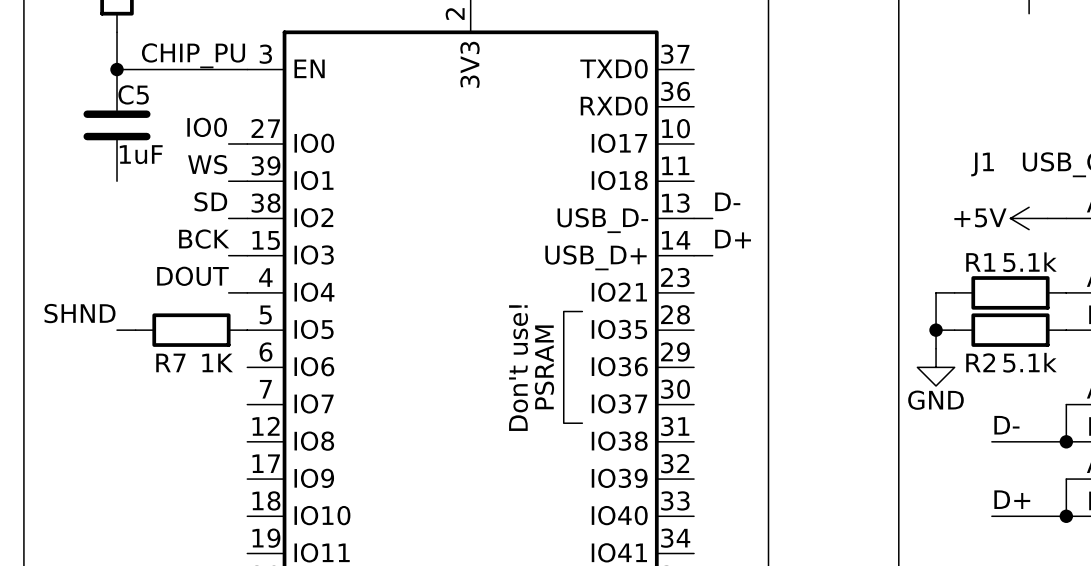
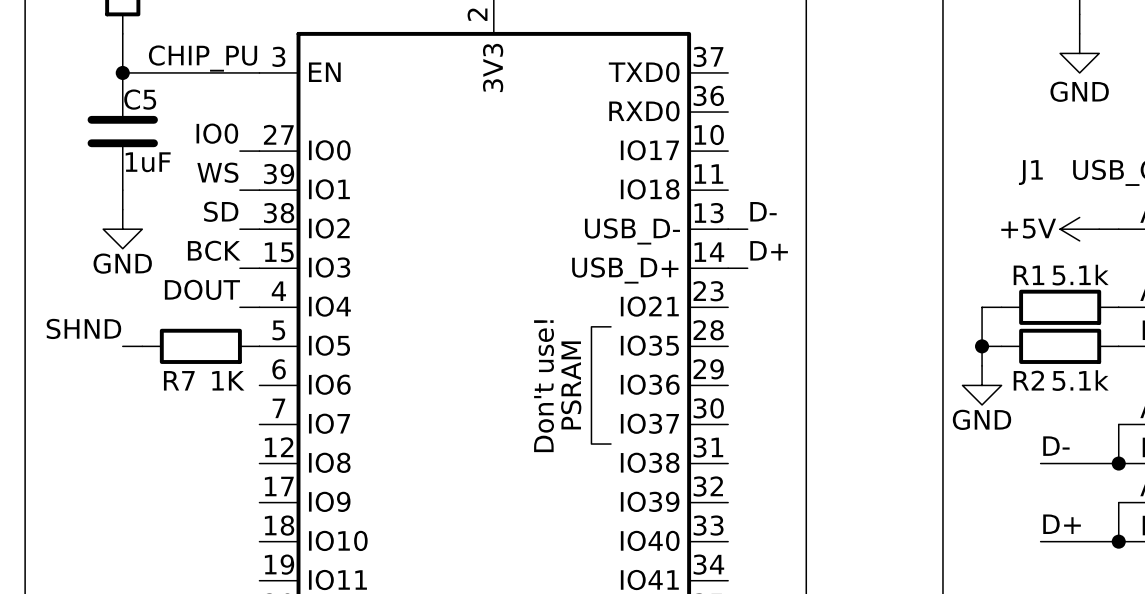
wire: none -> (1079, 14) (1079, 33)
power symbol: none -> GND (1079, 53)
wire: none -> (122, 190) (122, 209)
power symbol: none -> GND (122, 229)

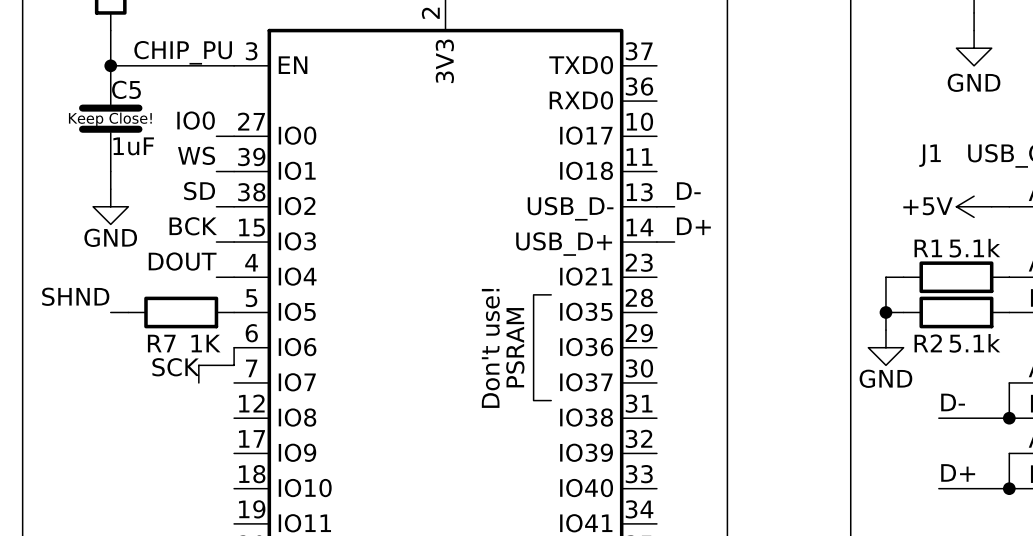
text: none -> Keep Close! (110, 119)
wire: none -> (234, 347) (234, 365) (198, 365) (198, 382)
label: none -> SCK (175, 367)

